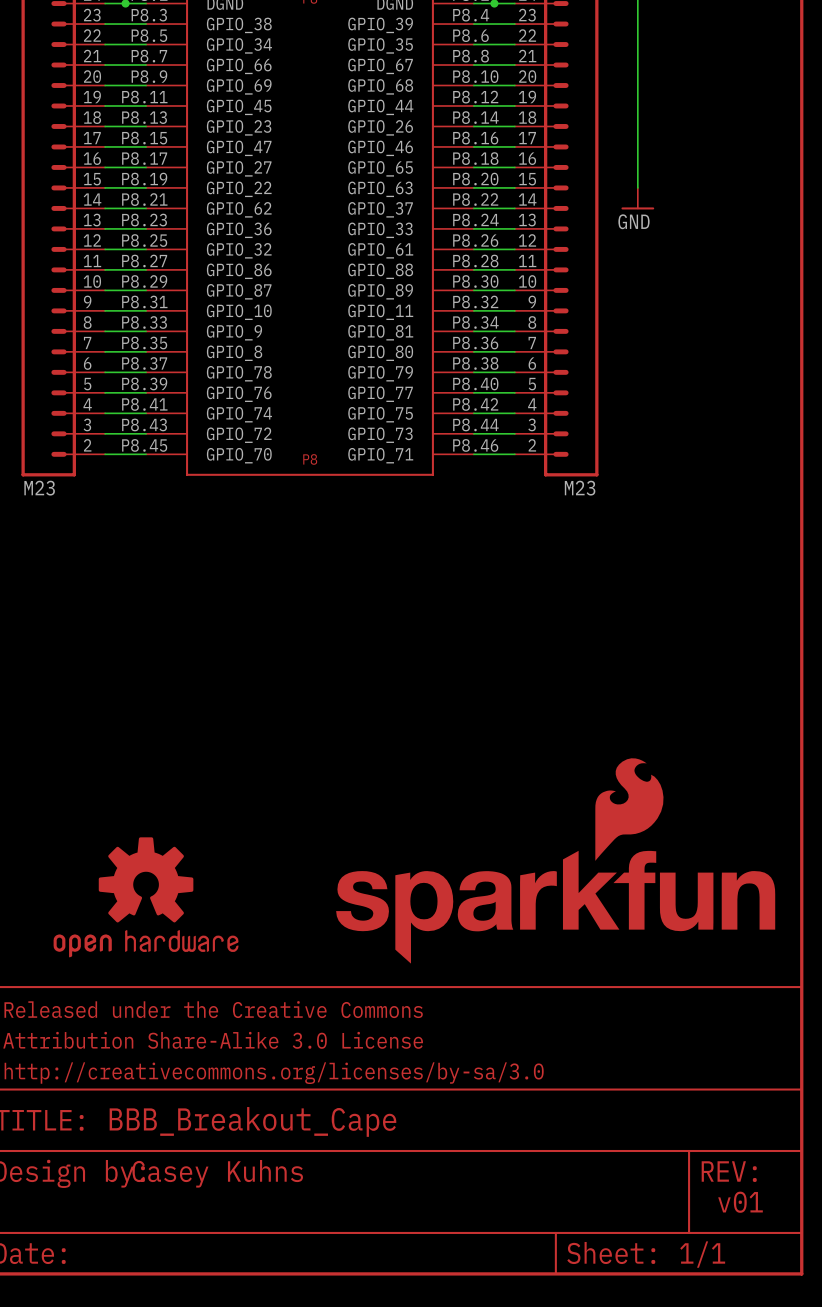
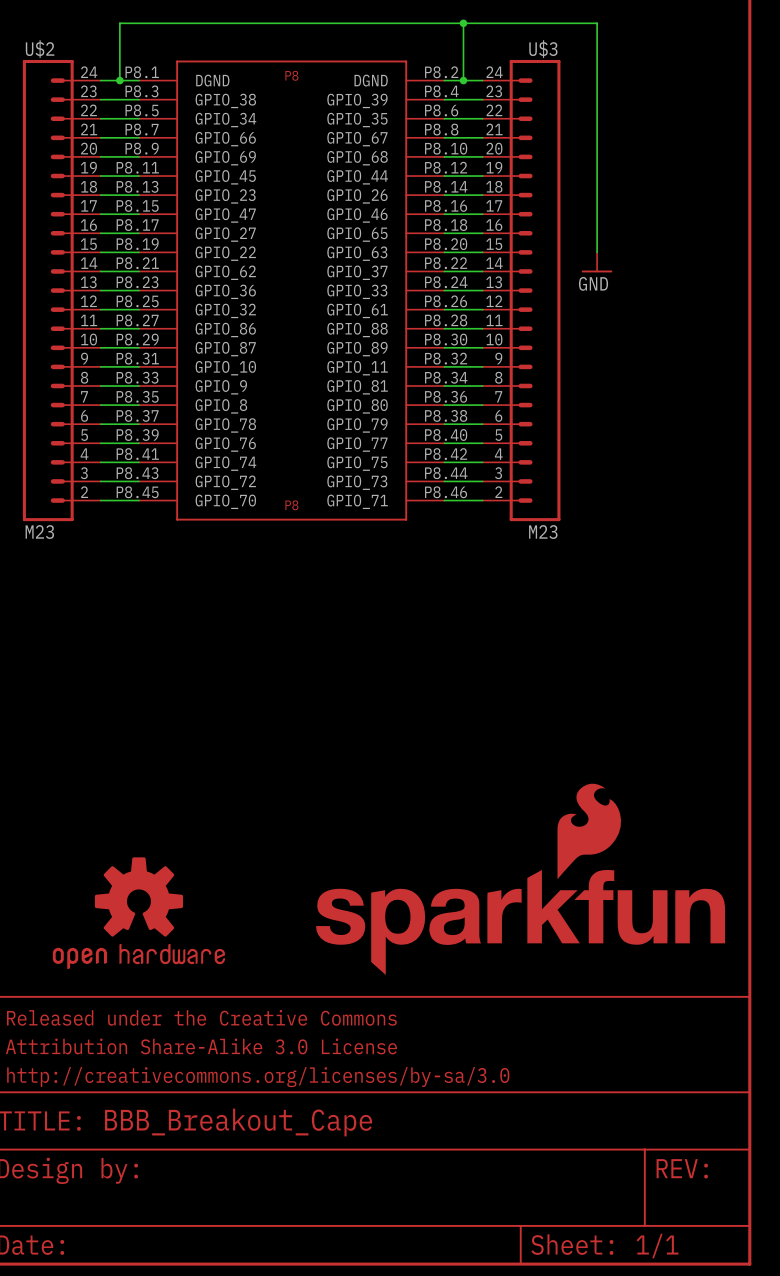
text: Casey Kuhns (217, 1173) -> none
text: v01 (740, 1202) -> none

